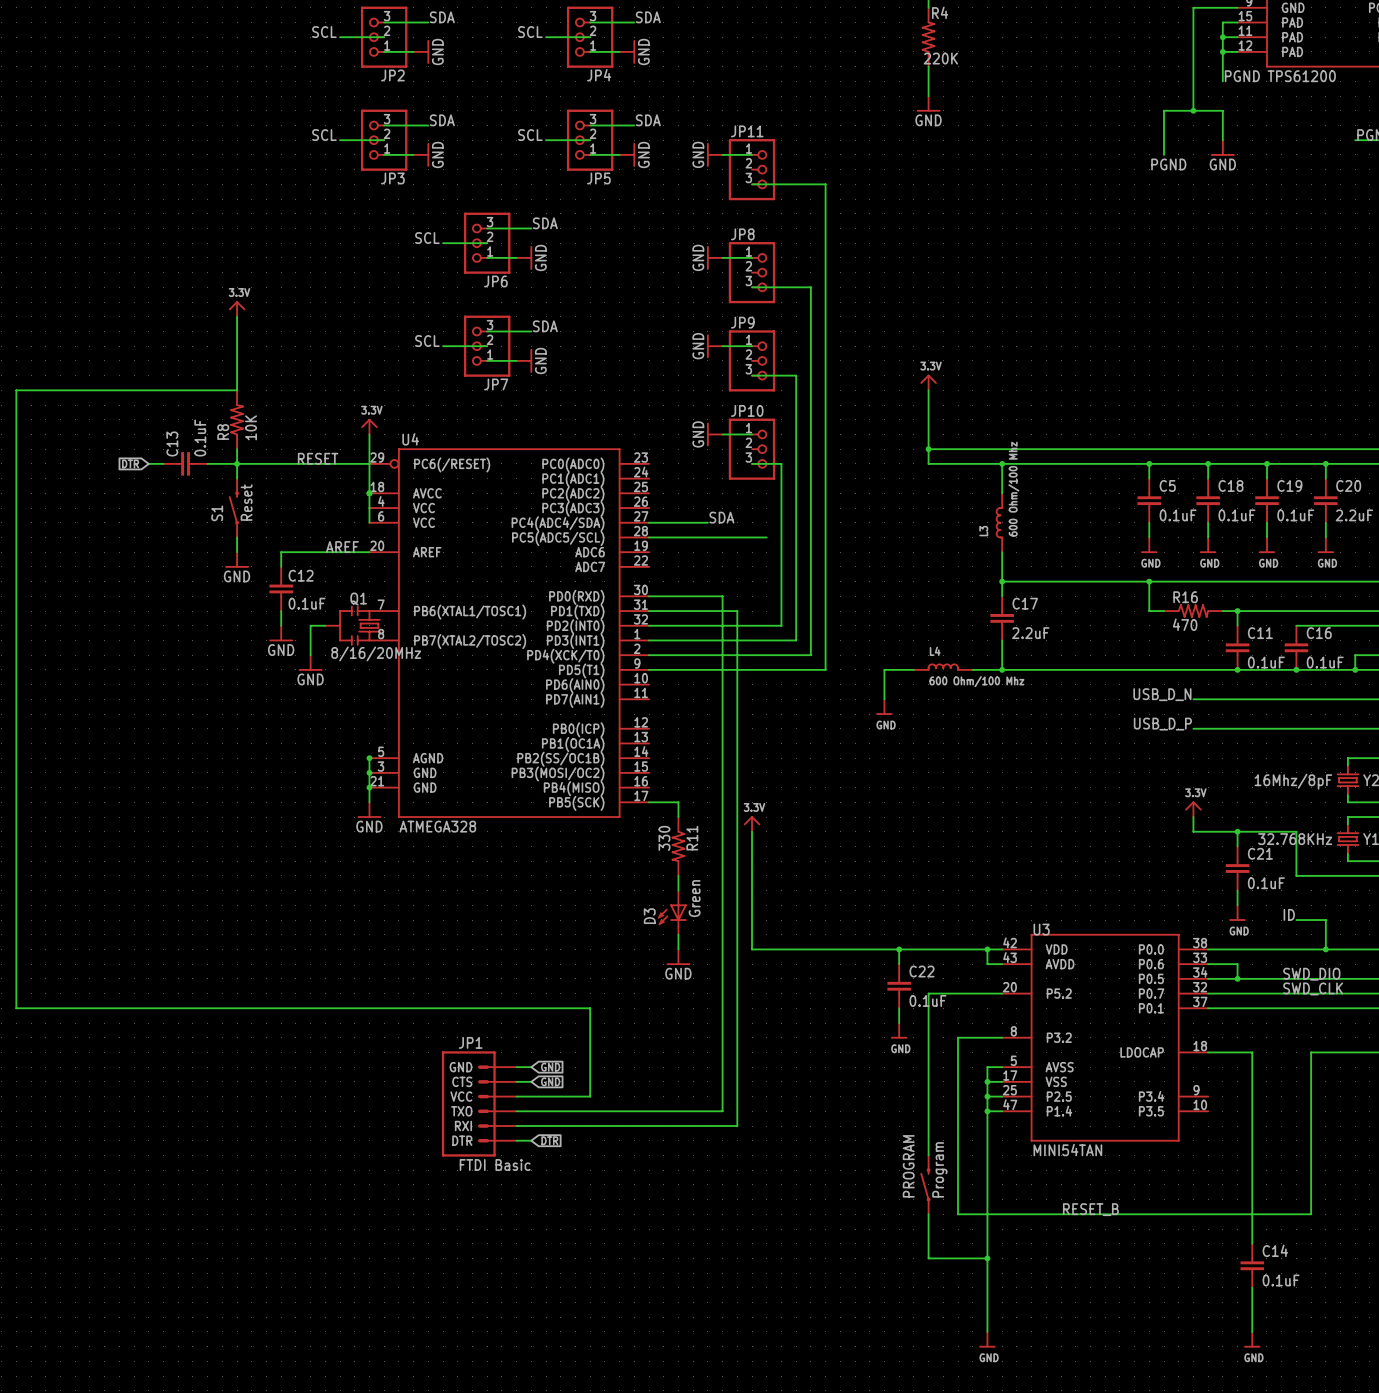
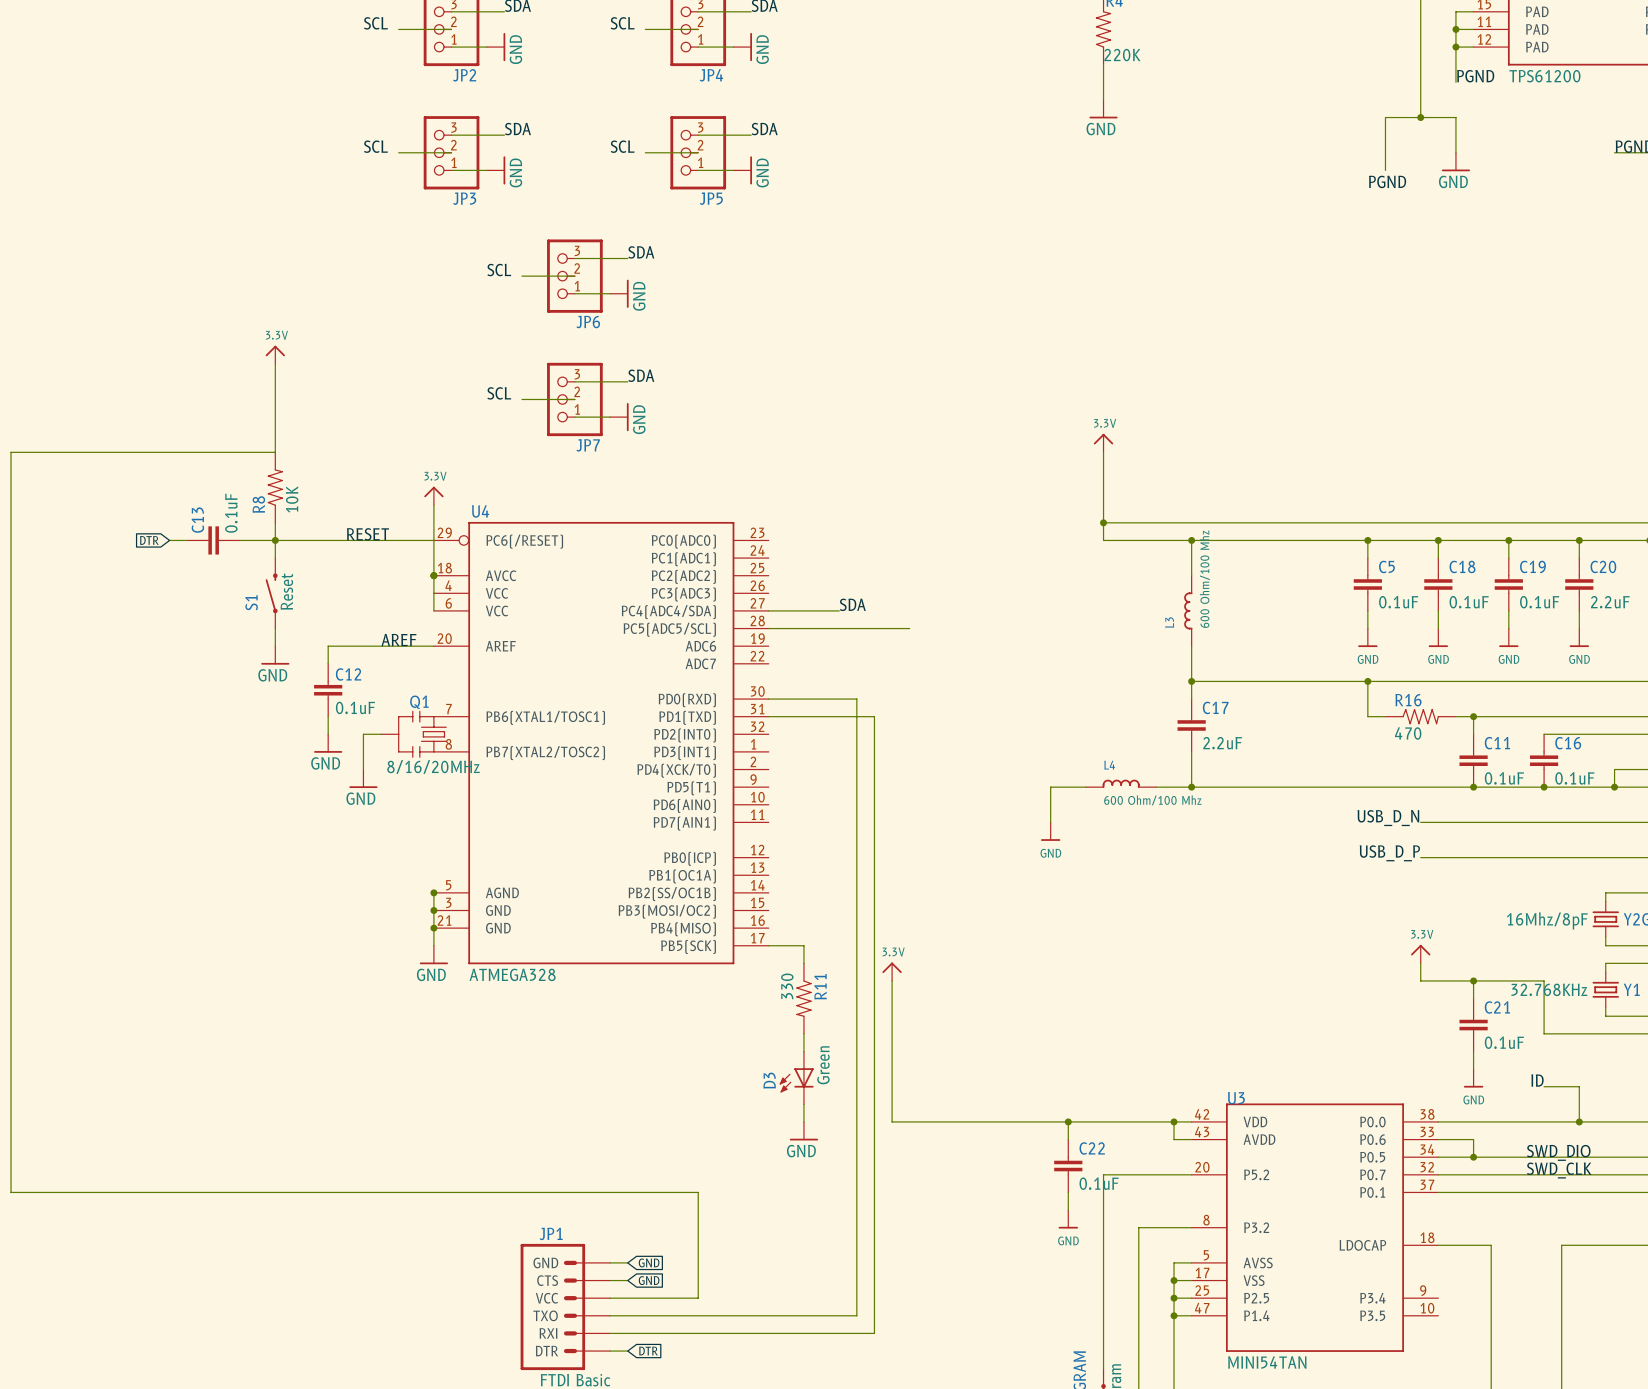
power symbol: GND (714, 154) -> none
wire: (722, 154) (752, 154) -> none
JP11: (752, 169) -> none
wire: (752, 184) (825, 184) (825, 669) (649, 669) -> none
power symbol: GND (714, 257) -> none
wire: (722, 257) (752, 257) -> none
JP8: (752, 272) -> none
wire: (752, 287) (810, 287) (810, 655) (649, 655) -> none
power symbol: GND (714, 346) -> none
wire: (722, 346) (752, 346) -> none
JP9: (752, 360) -> none
wire: (752, 375) (796, 375) (796, 640) (649, 640) -> none
power symbol: GND (714, 434) -> none
wire: (722, 434) (752, 434) -> none
JP10: (752, 449) -> none
wire: (752, 463) (781, 463) (781, 625) (649, 625) -> none

